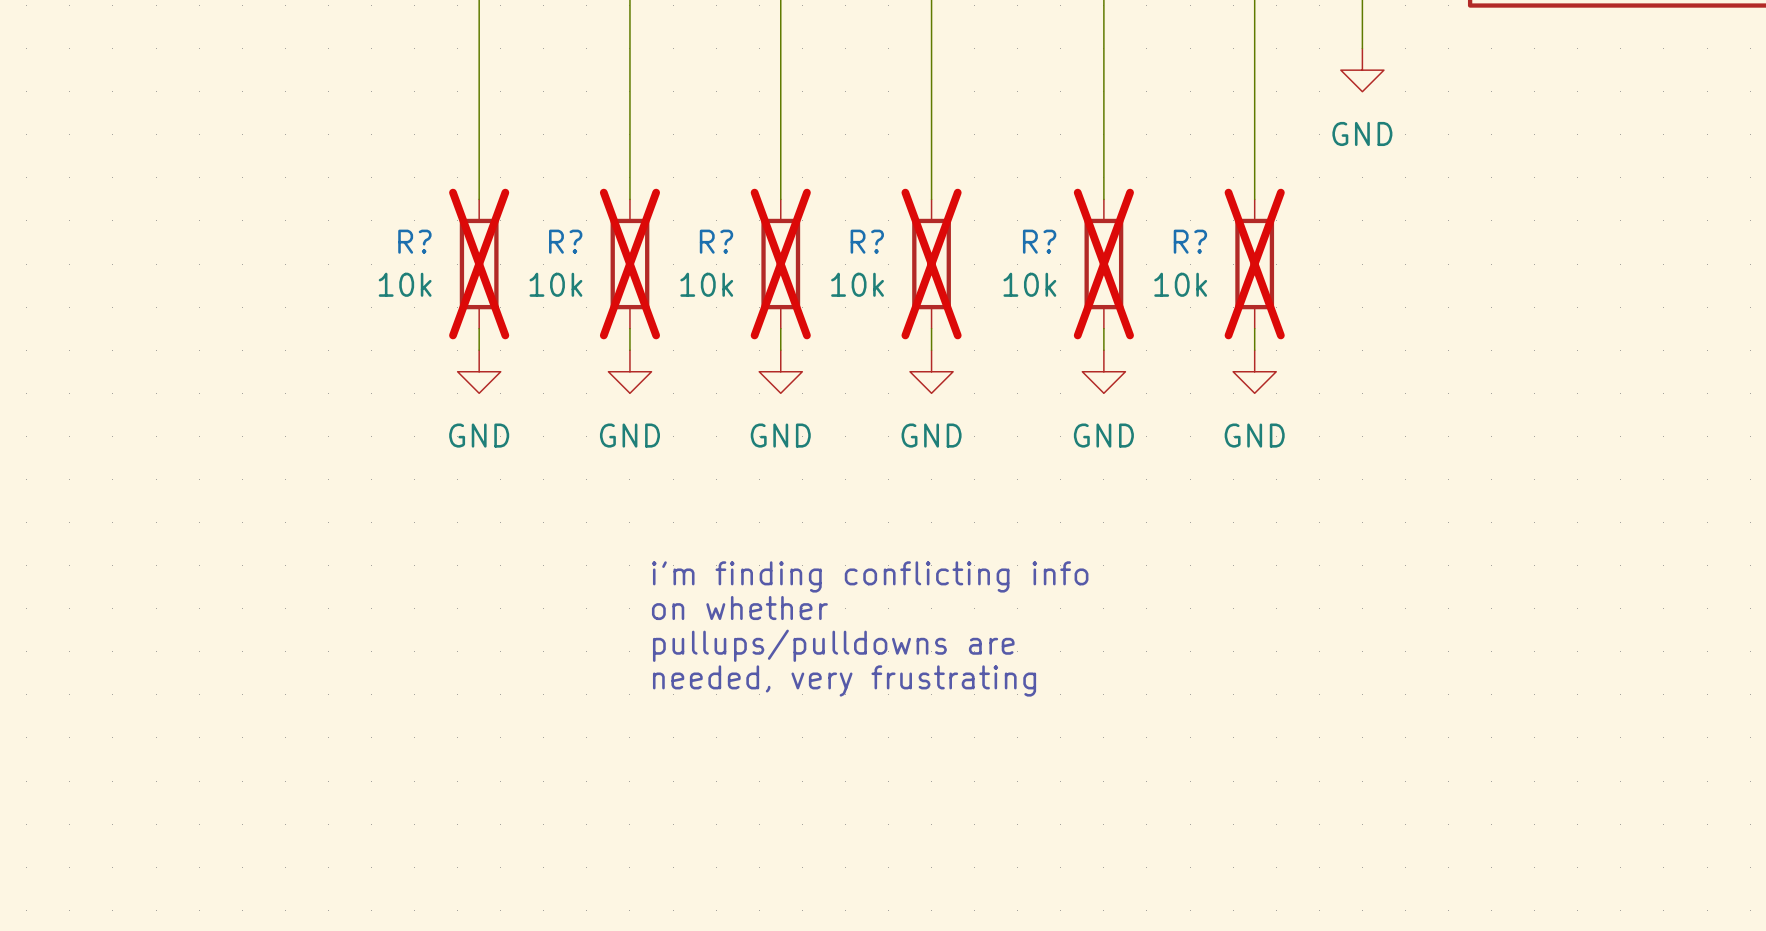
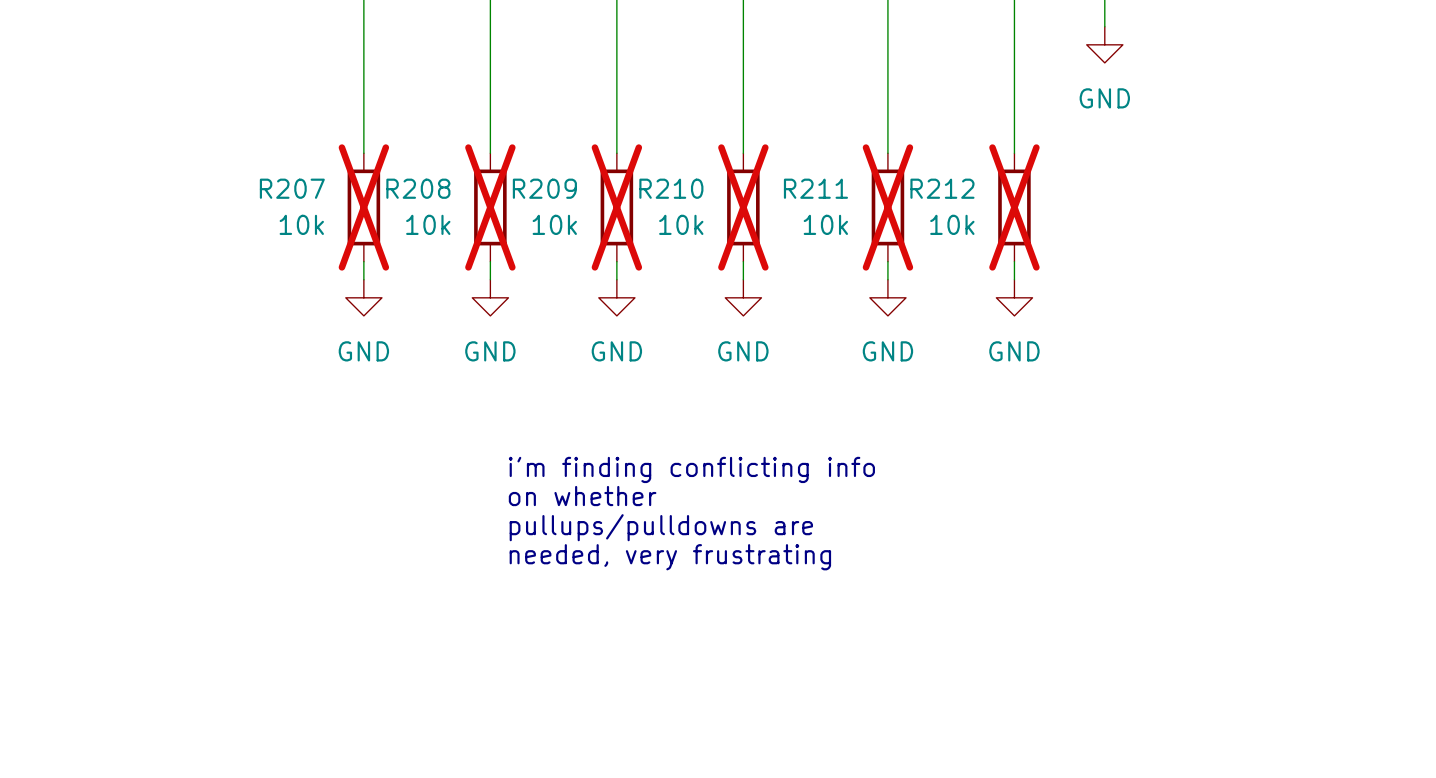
R? name: R? (414, 241) -> R207 (292, 188)
R? name: R? (565, 241) -> R208 (418, 188)
R? name: R? (716, 241) -> R209 (544, 188)
R? name: R? (867, 241) -> R210 (671, 188)
R? name: R? (1039, 241) -> R211 (815, 188)
R? name: R? (1190, 241) -> R212 (942, 188)

